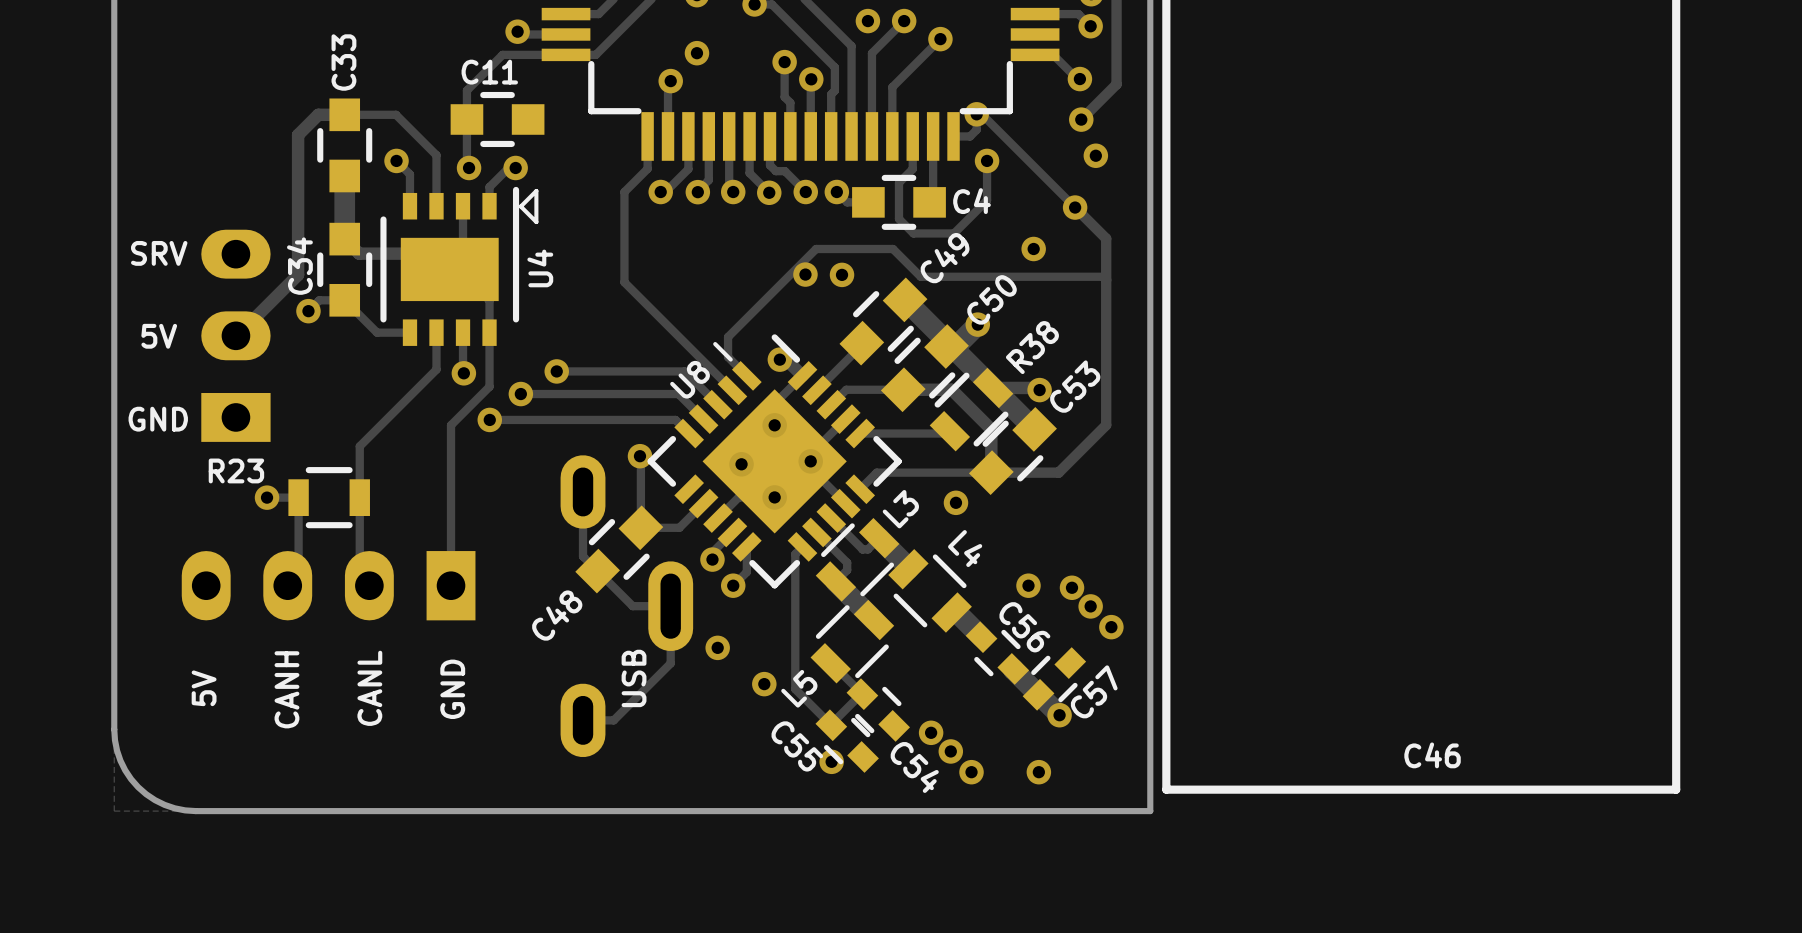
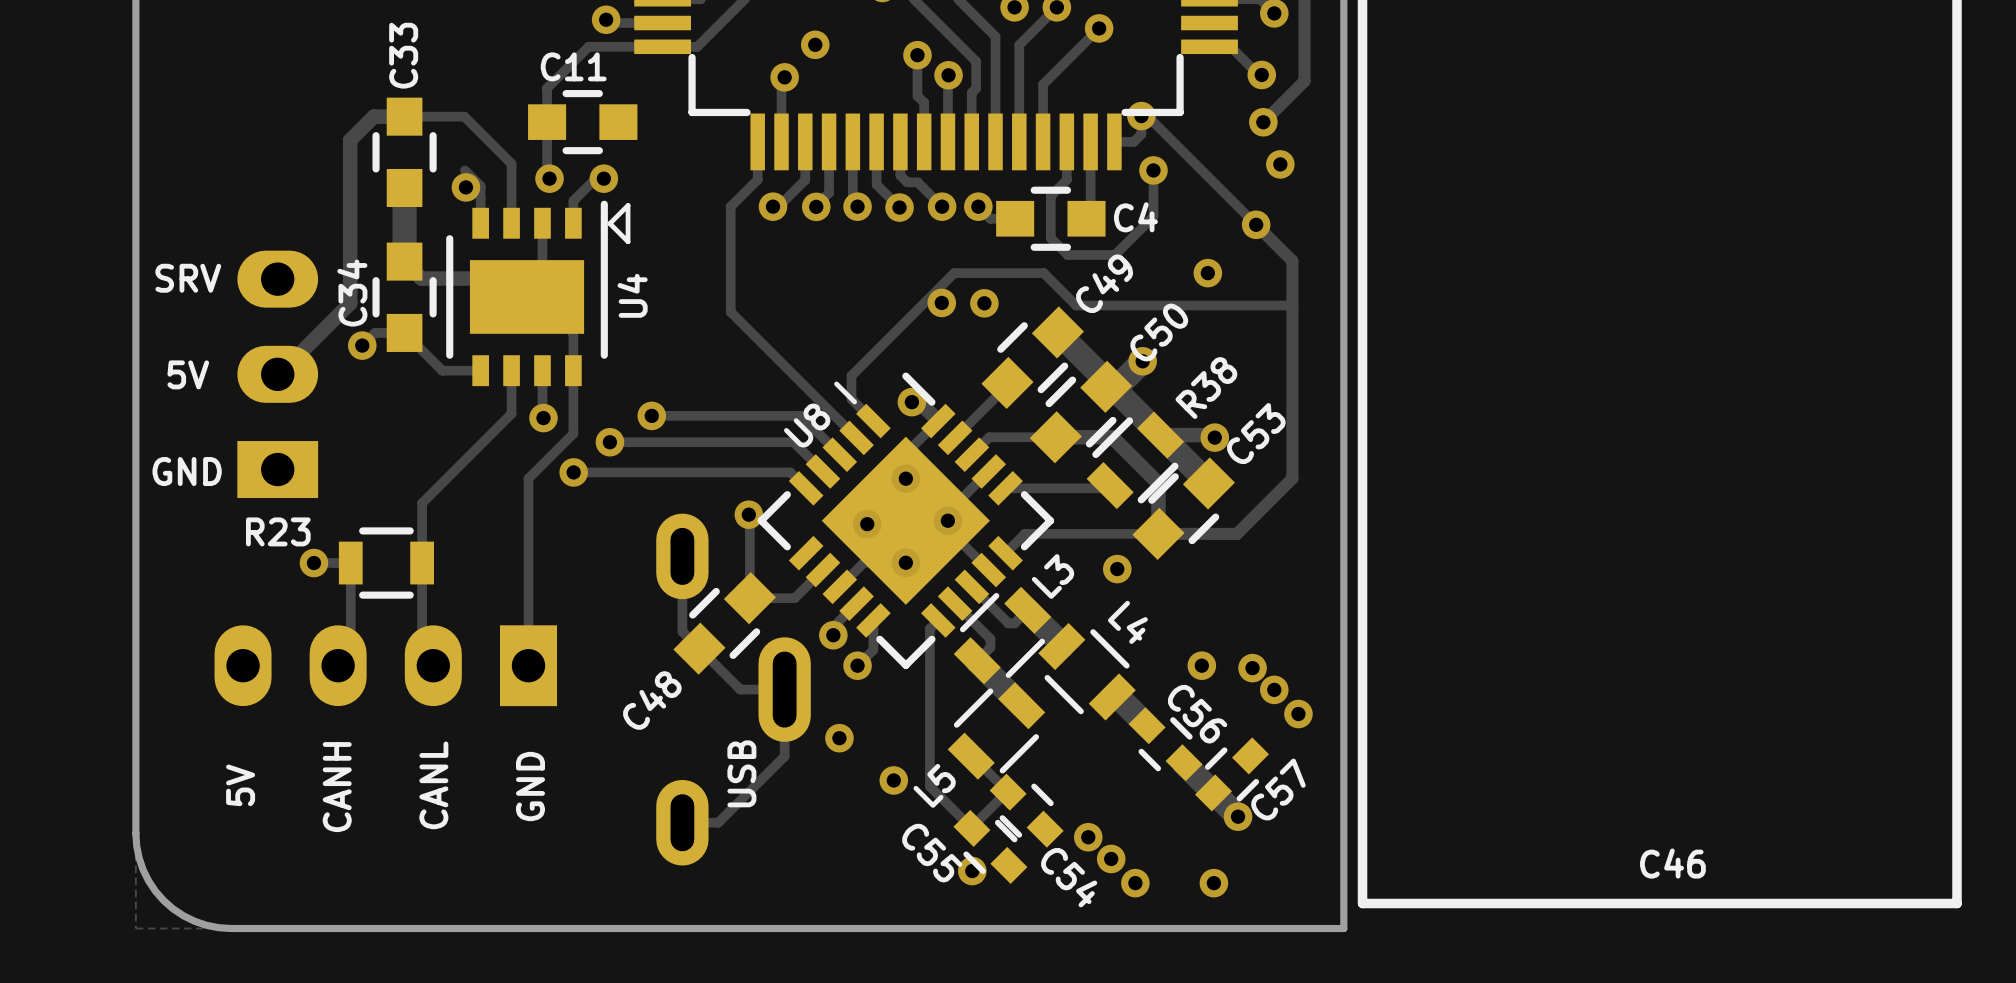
via position: (396, 160) -> (465, 187)

